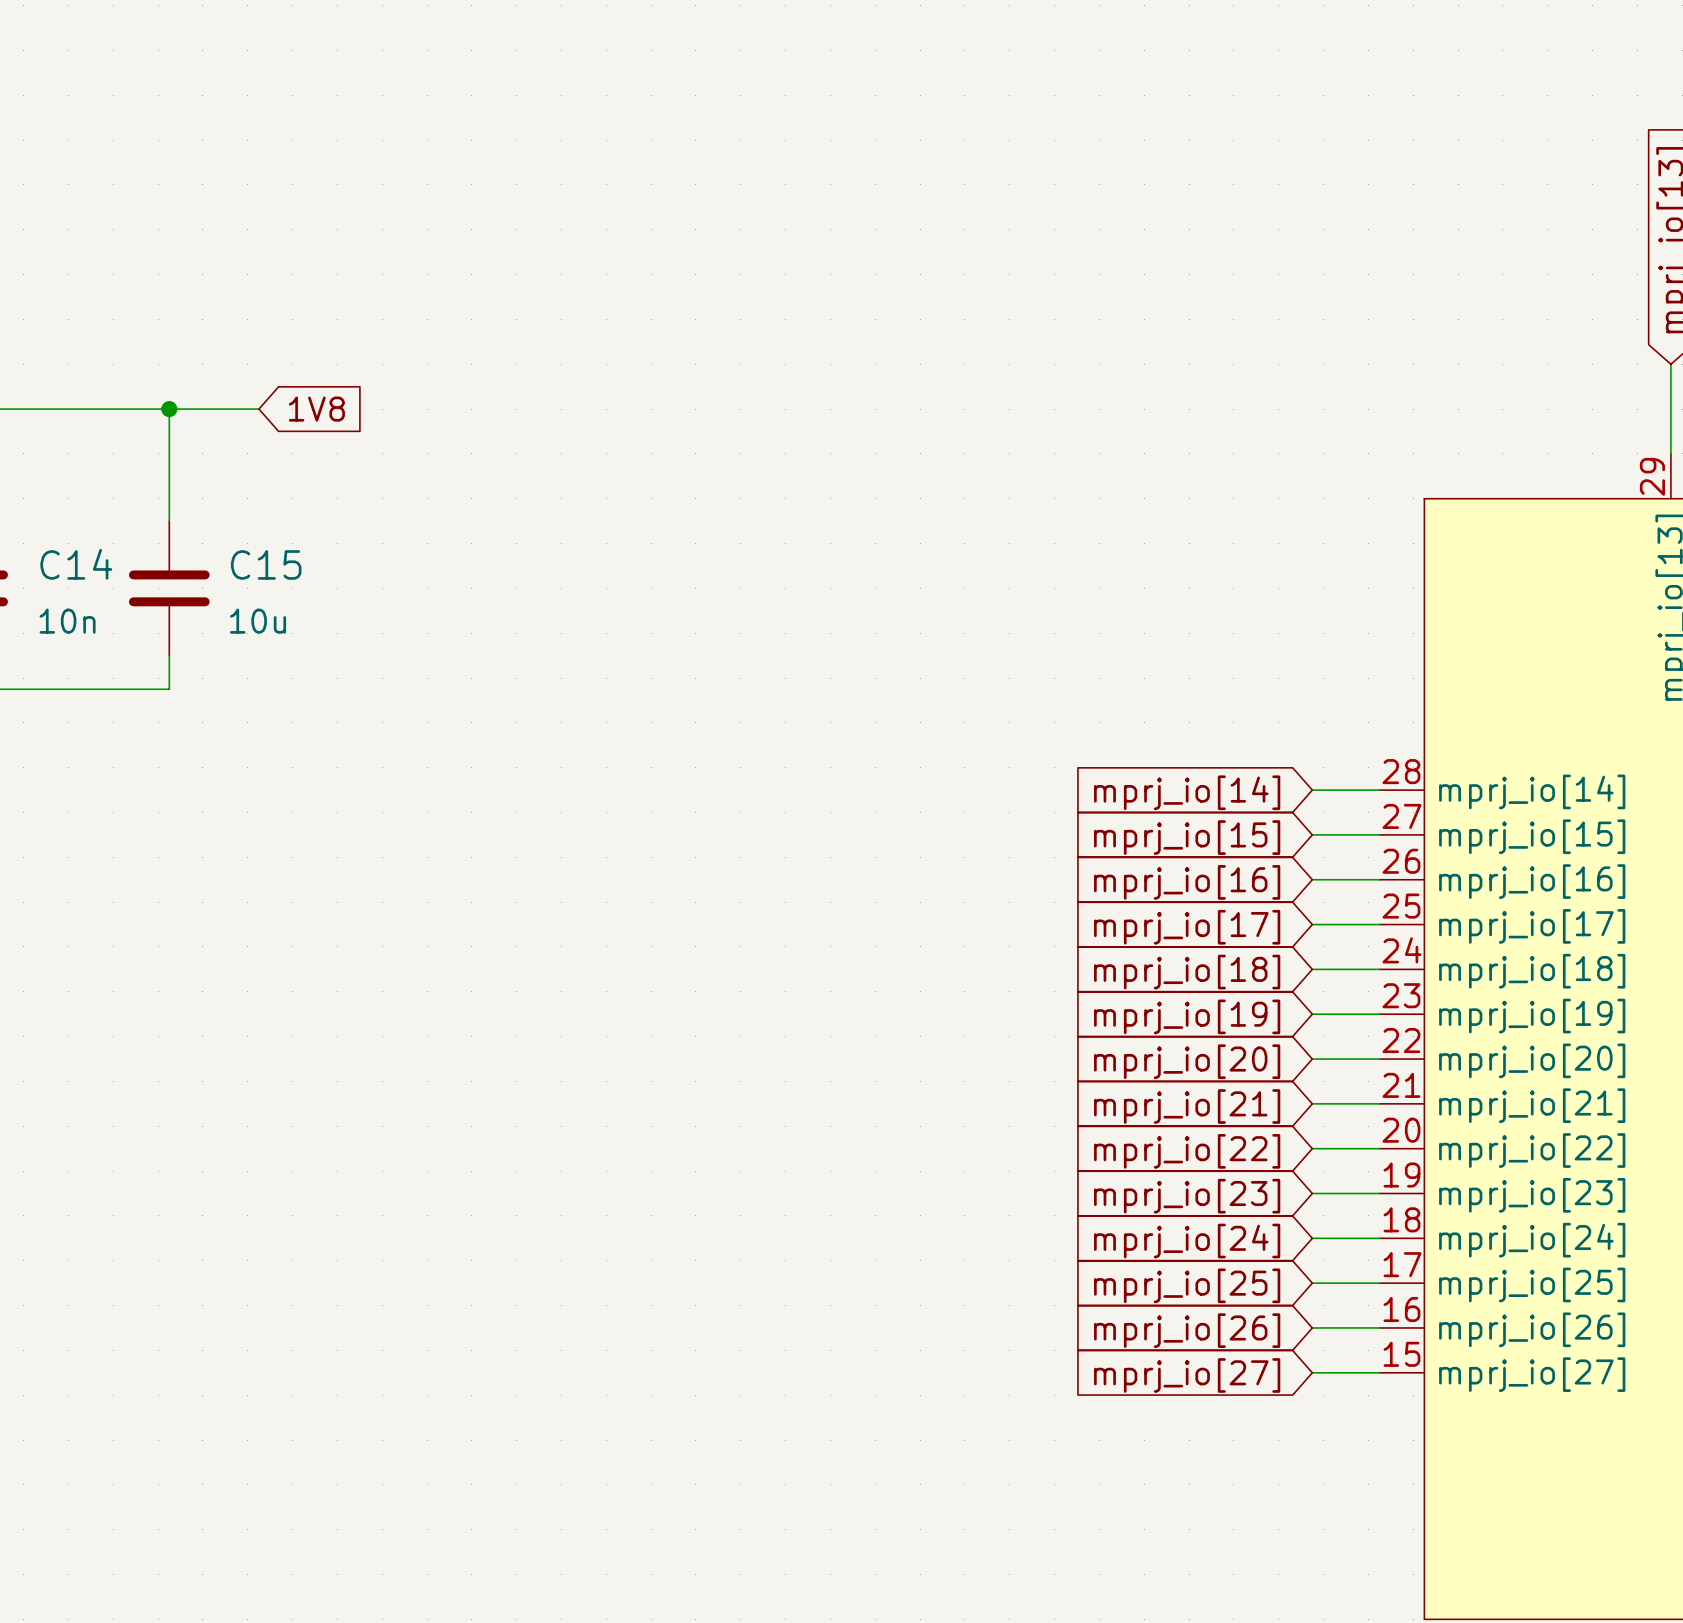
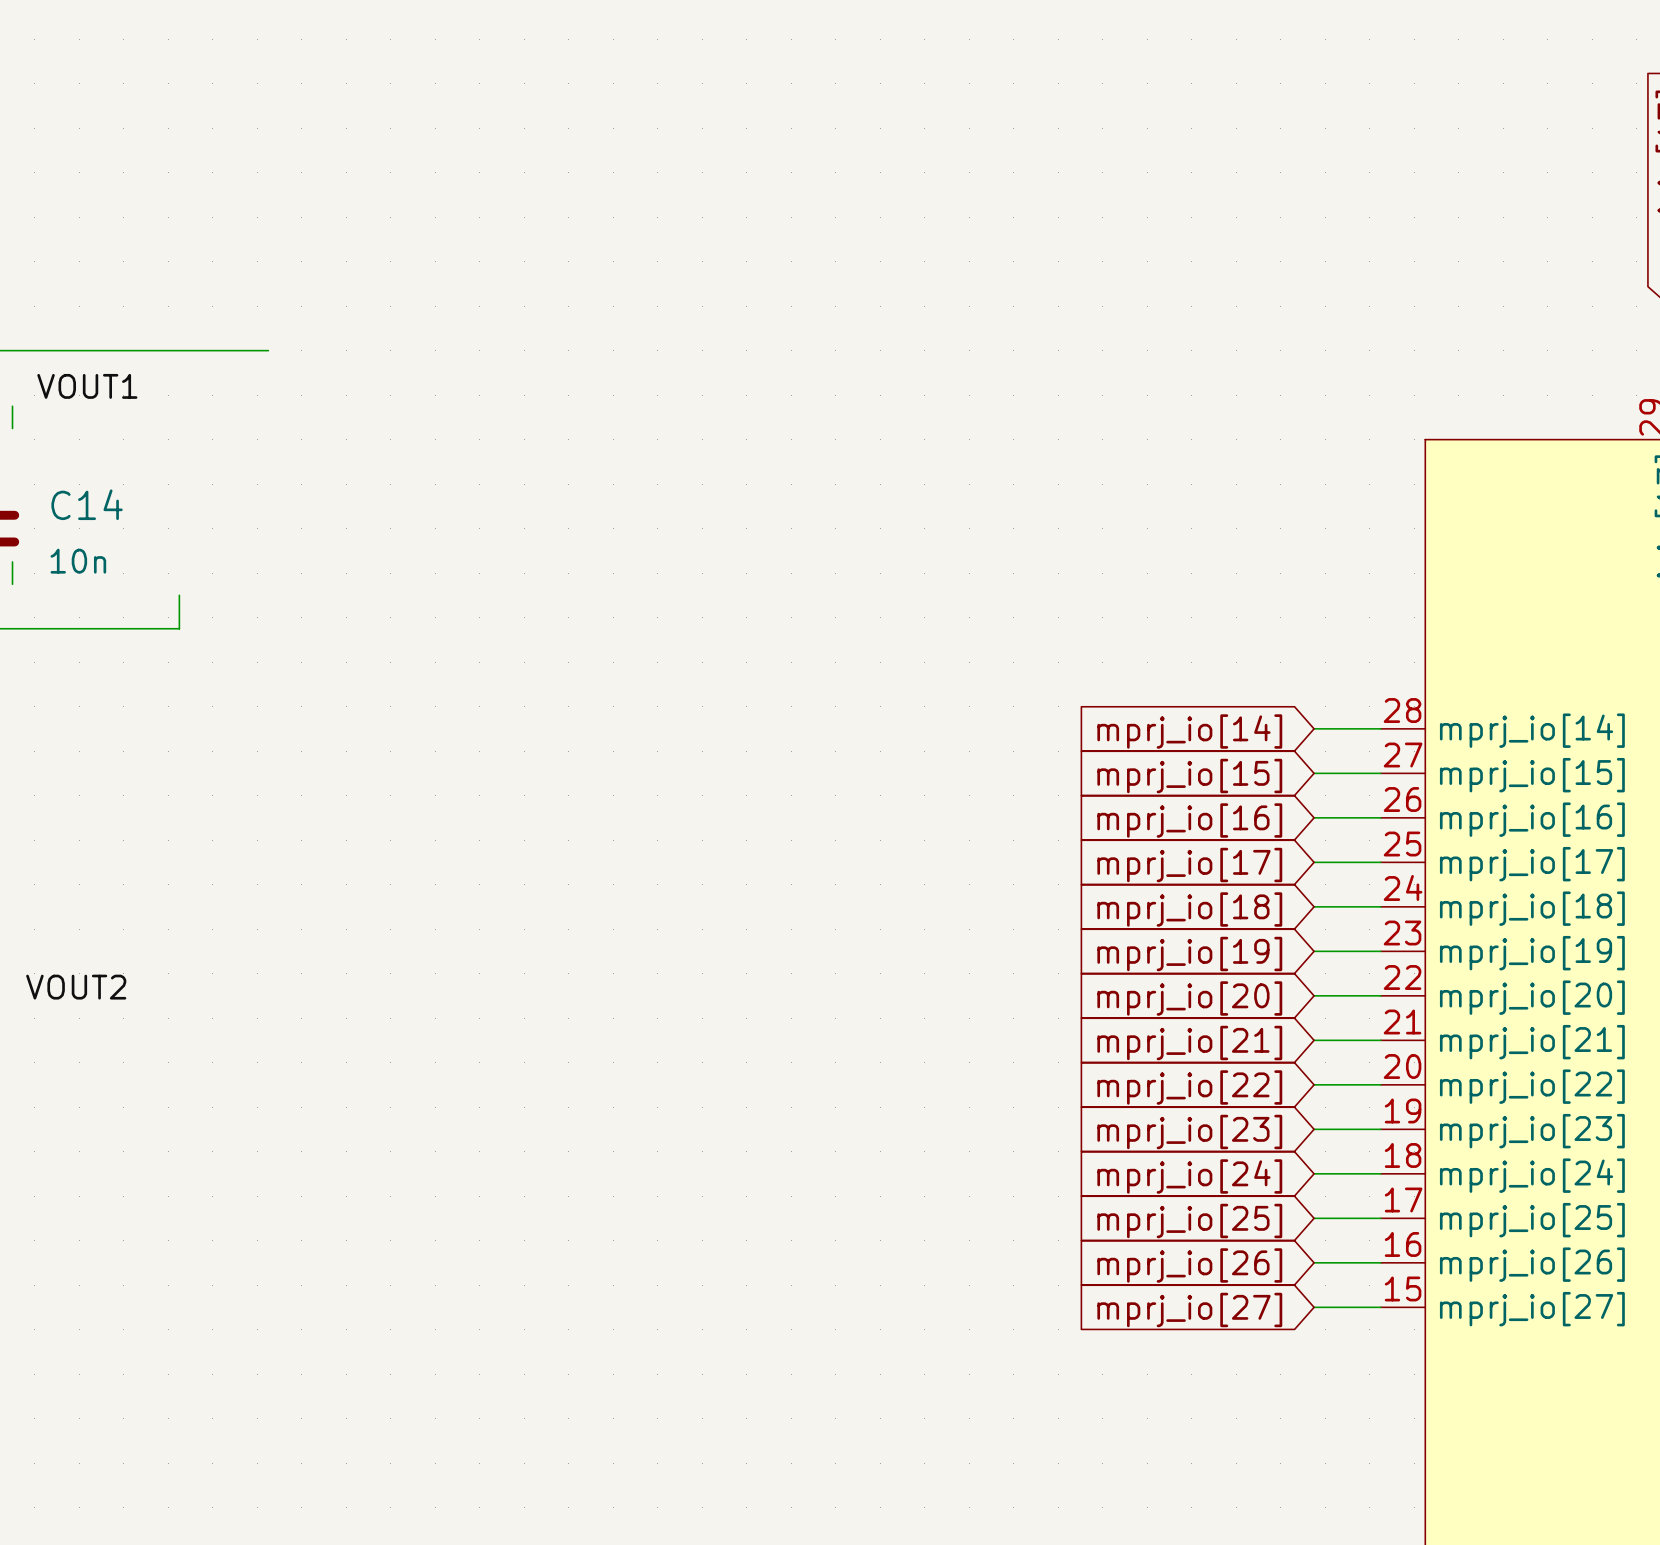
wire: (169, 409) (169, 521) -> none
junction: (169, 409) -> none
global label: 1V8 (316, 409) -> none
label: none -> VOUT1 (87, 386)
wire: none -> (12, 406) (12, 428)
C15: (169, 588) -> none
wire: none -> (12, 561) (12, 584)
label: none -> VOUT2 (76, 987)

